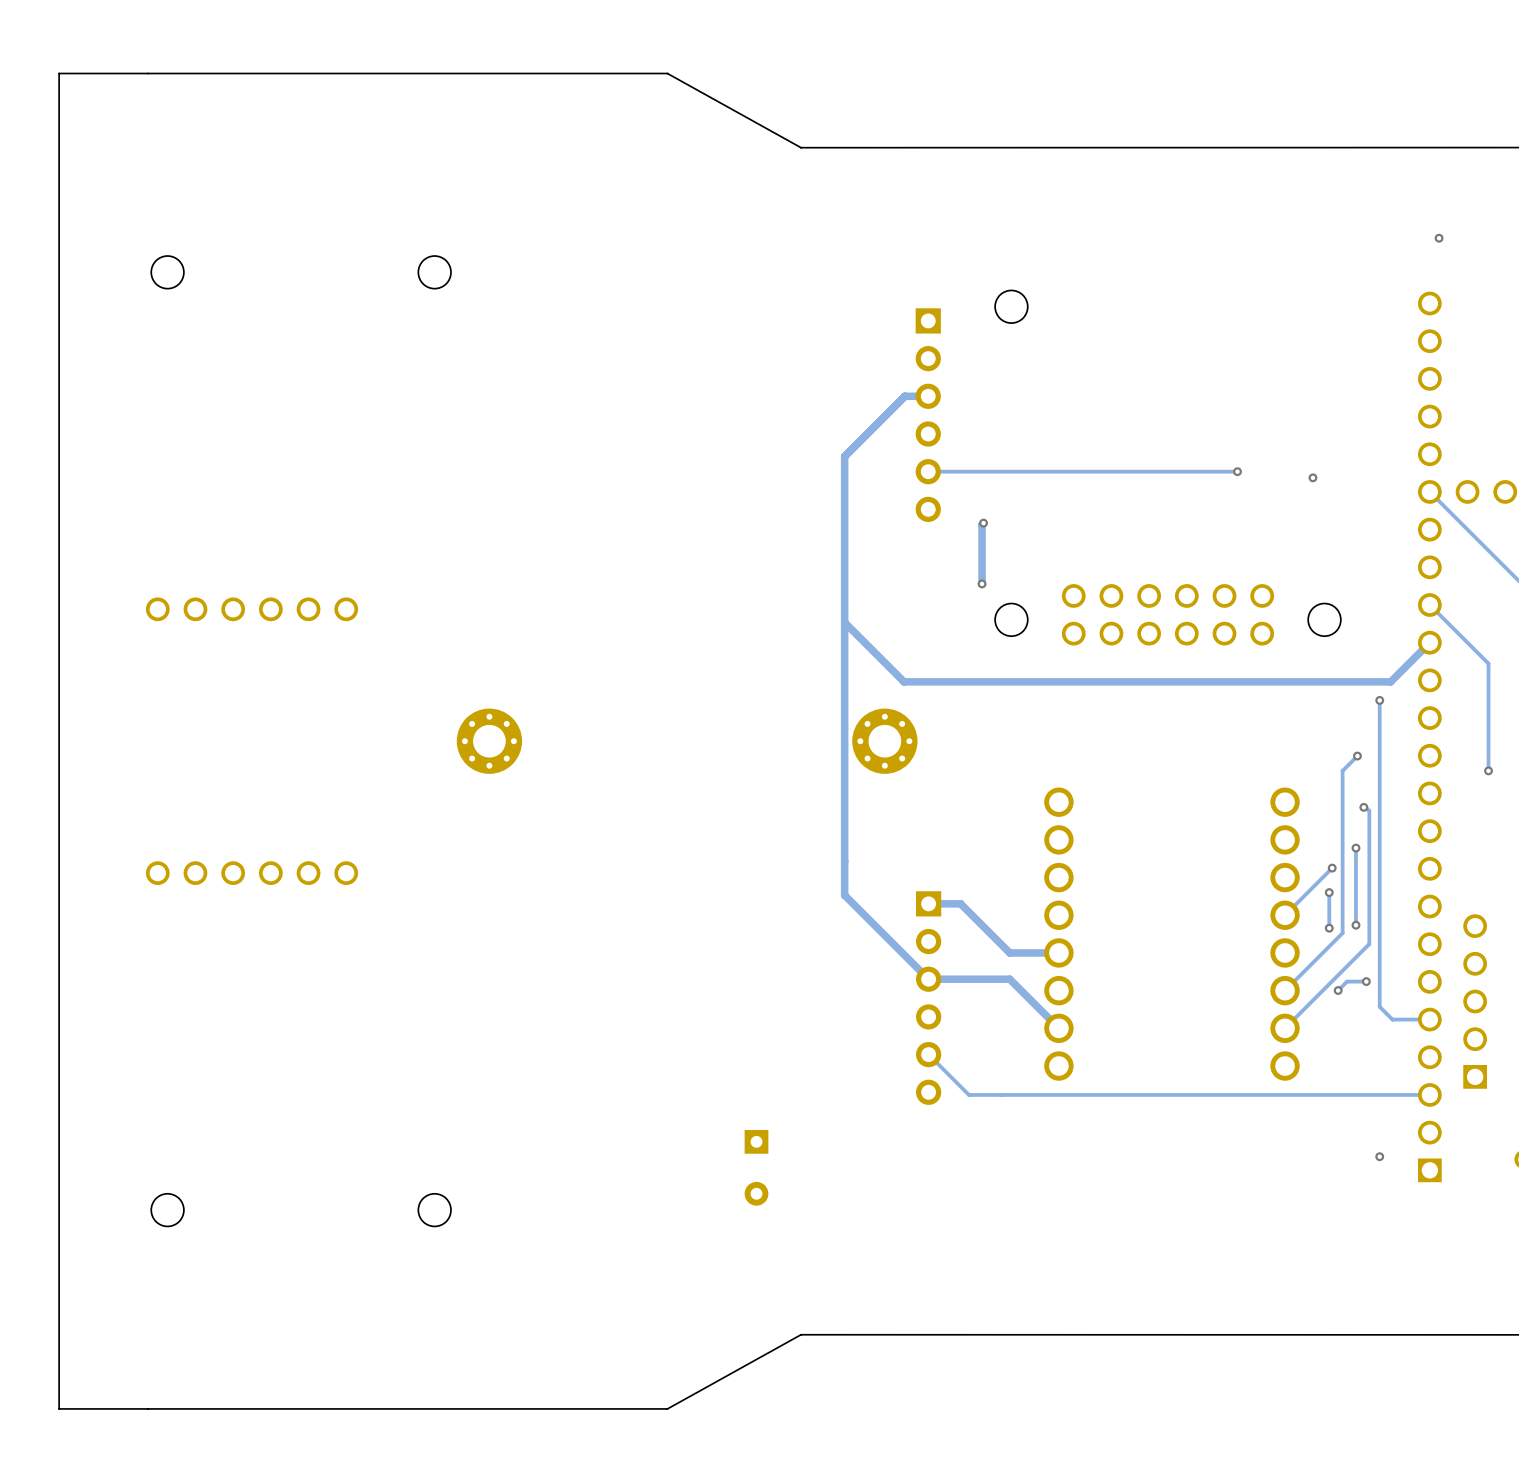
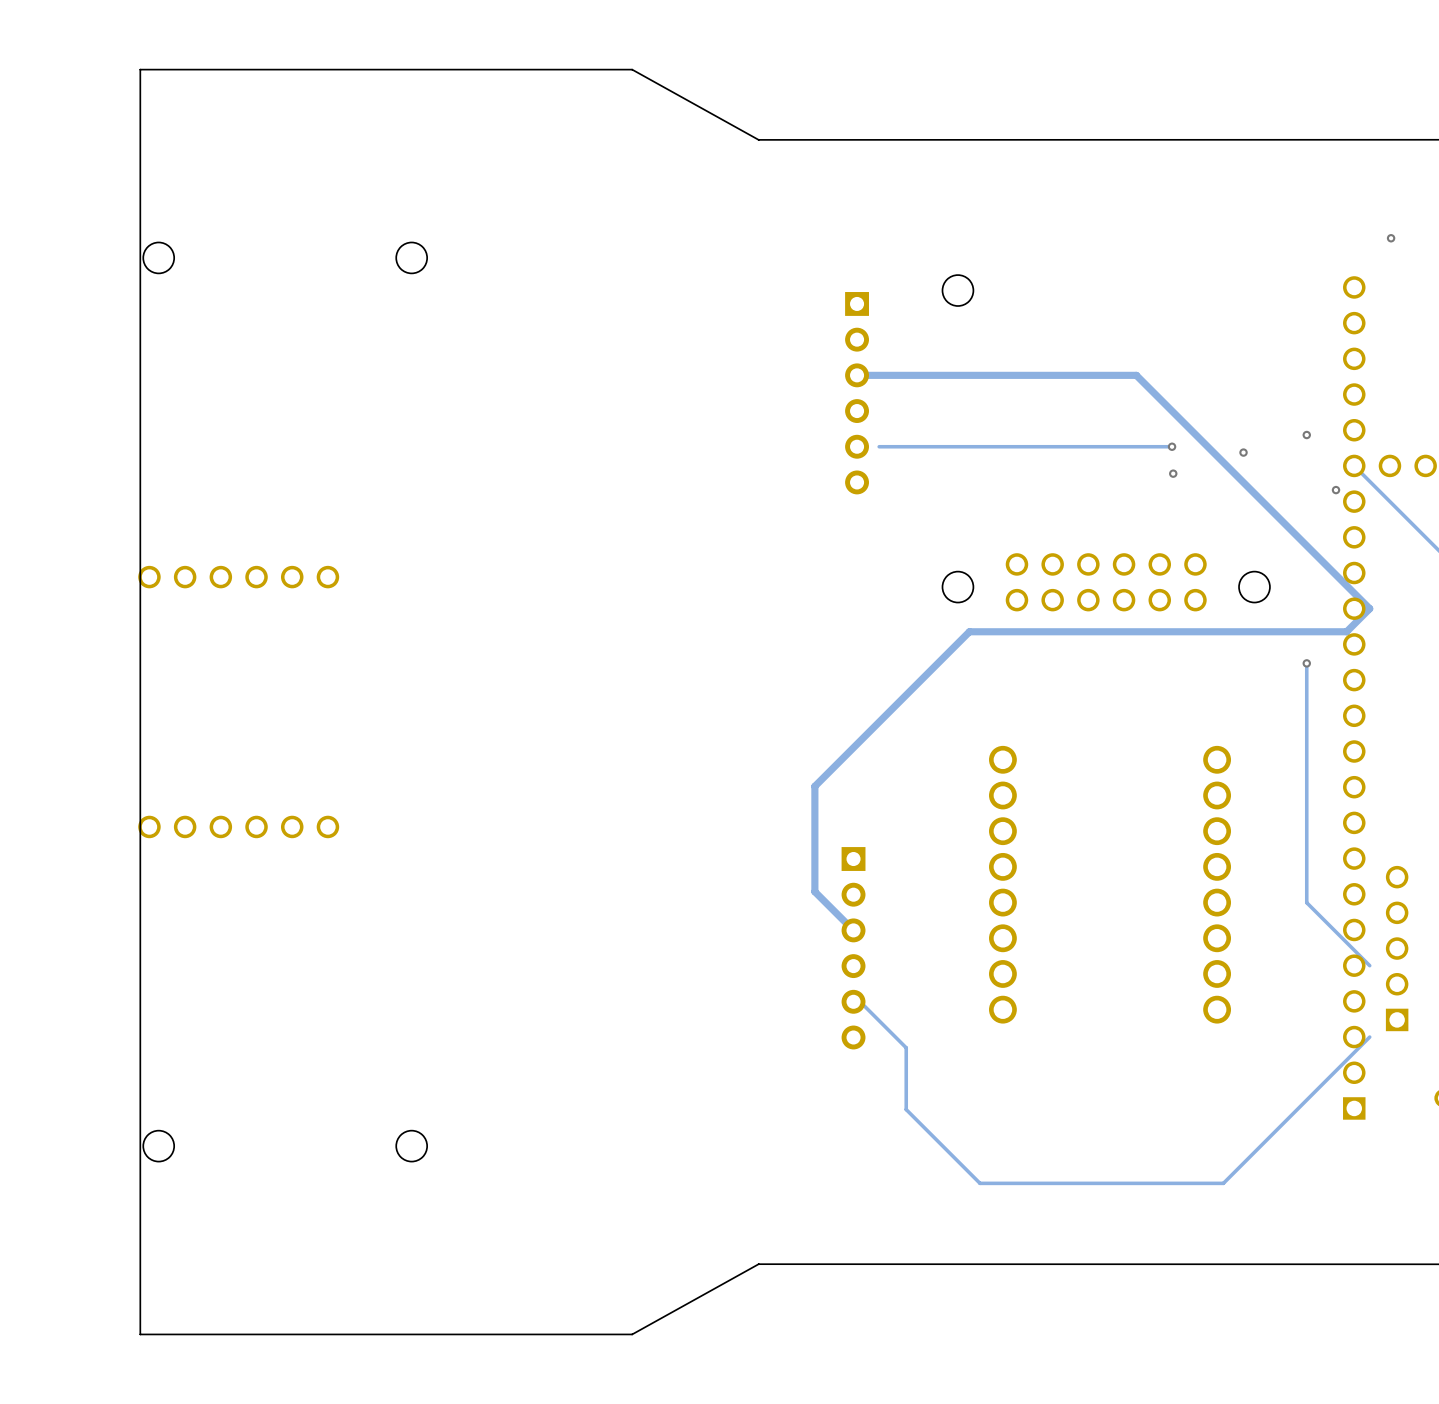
board edge: (148, 73) (59, 73) (59, 1408) (148, 1408) -> (140, 69) (140, 1334)
via position: (1439, 238) -> (1391, 238)
track: (904, 396) (844, 456) (844, 895) (928, 979) (1009, 979) (1058, 1028) -> none
track: none -> (879, 375) (1136, 375) (1369, 608) (1346, 631) (969, 631) (814, 786) (814, 891) (853, 930)
part position: (928, 415) -> (857, 393)
via: none -> (1306, 435)
via: none -> (1173, 473)
via: none -> (1336, 490)
track: (983, 523) (982, 583) -> none
via: (983, 523) -> none
via: (982, 583) -> none
track: (1429, 605) (1488, 663) (1488, 770) -> none
track: (844, 622) (904, 681) (1390, 681) (1429, 642) -> none
part: (489, 741) -> none
part: (884, 741) -> none
track: (1357, 756) (1342, 770) (1342, 933) (1285, 990) -> none
via: (1357, 756) -> none
via: (1488, 770) -> none
track: (1364, 806) (1369, 810) (1369, 944) (1285, 1028) -> none
via: (1363, 807) -> none
track: (1355, 848) (1355, 925) -> none
via: (1355, 848) -> none
track: (1332, 868) (1285, 915) -> none
via: (1332, 868) -> none
track: (1329, 892) (1329, 928) -> none
via: (1329, 892) -> none
track: (928, 903) (960, 903) (1009, 952) (1058, 952) -> none
via: (1355, 925) -> none
via: (1329, 928) -> none
track: (1379, 953) (1379, 1006) (1392, 1019) (1429, 1019) -> (1306, 902) (1369, 965)
track: (1366, 981) (1347, 981) (1338, 990) -> none
via: (1366, 981) -> none
via: (1338, 990) -> none
part position: (928, 998) -> (853, 948)
track: (928, 1054) (968, 1094) (1429, 1094) -> none
track: none -> (853, 1001) (860, 1001) (906, 1047) (906, 1109) (980, 1183) (1223, 1183) (1369, 1037)
via: (1379, 1156) -> none
part: (756, 1167) -> none

